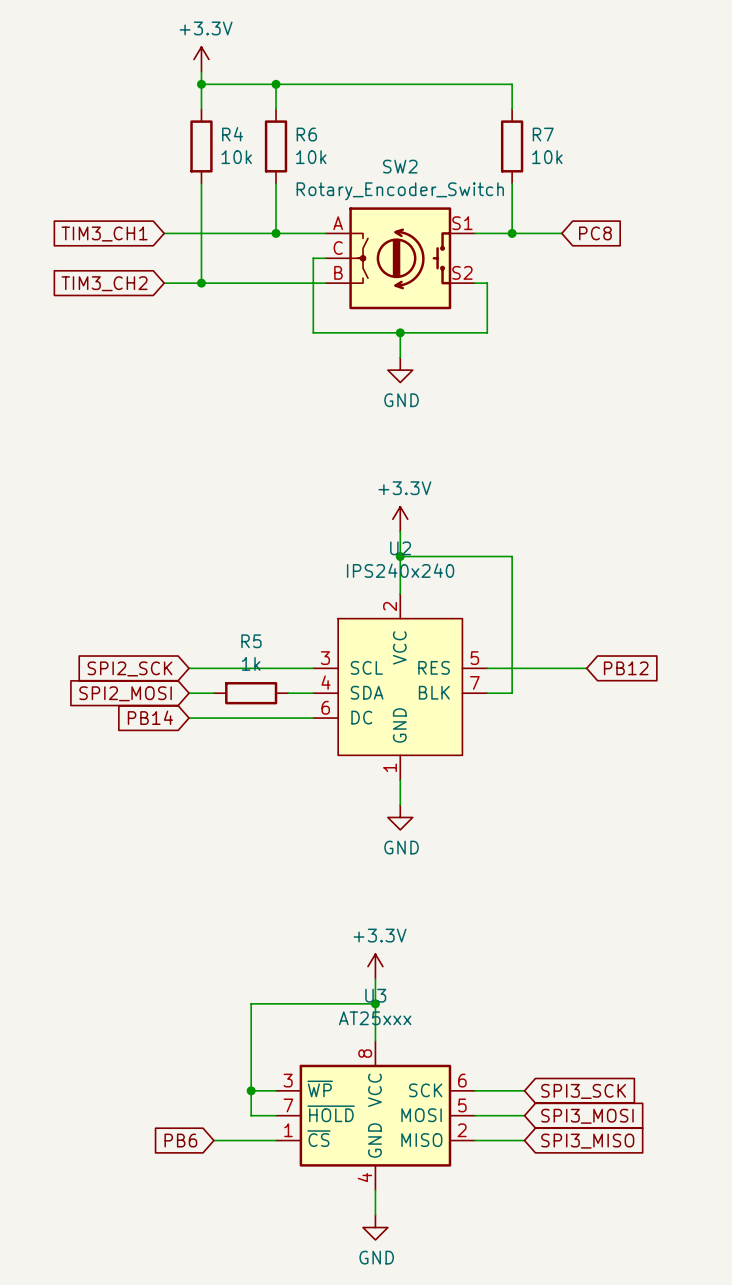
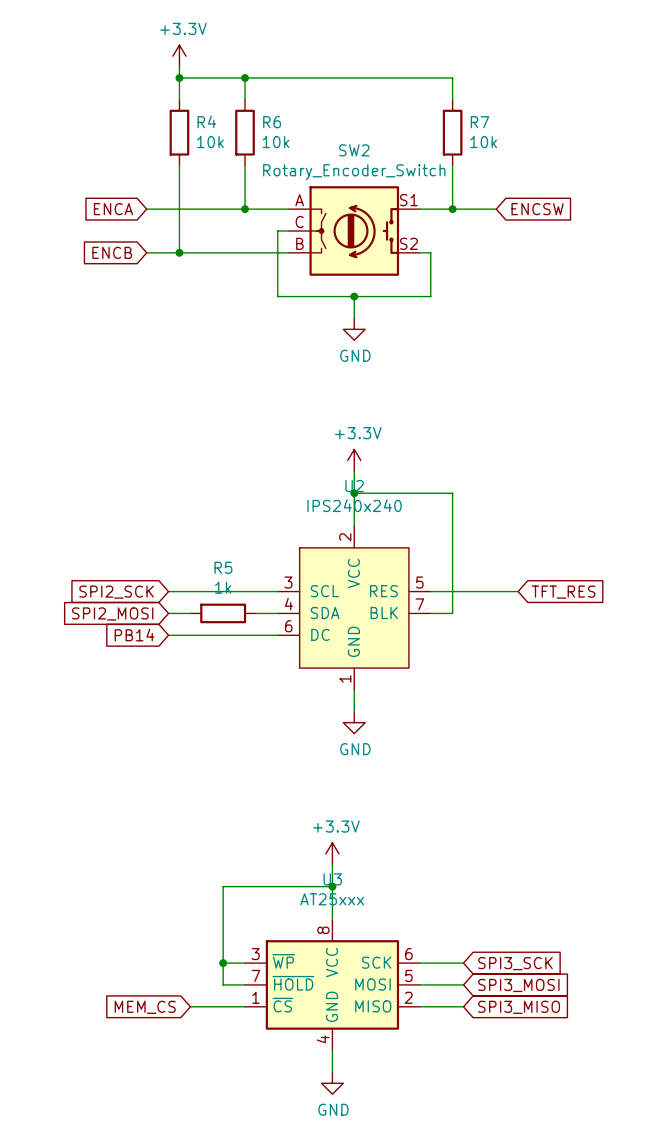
global label: PC8 (595, 233) -> ENCSW (537, 209)
global label: TIM3_CH1 (104, 234) -> ENCA (113, 209)
global label: TIM3_CH2 (104, 283) -> ENCB (112, 252)
global label: PB12 (626, 668) -> TFT_RES (563, 592)
global label: PB6 (180, 1140) -> MEM_CS (145, 1007)

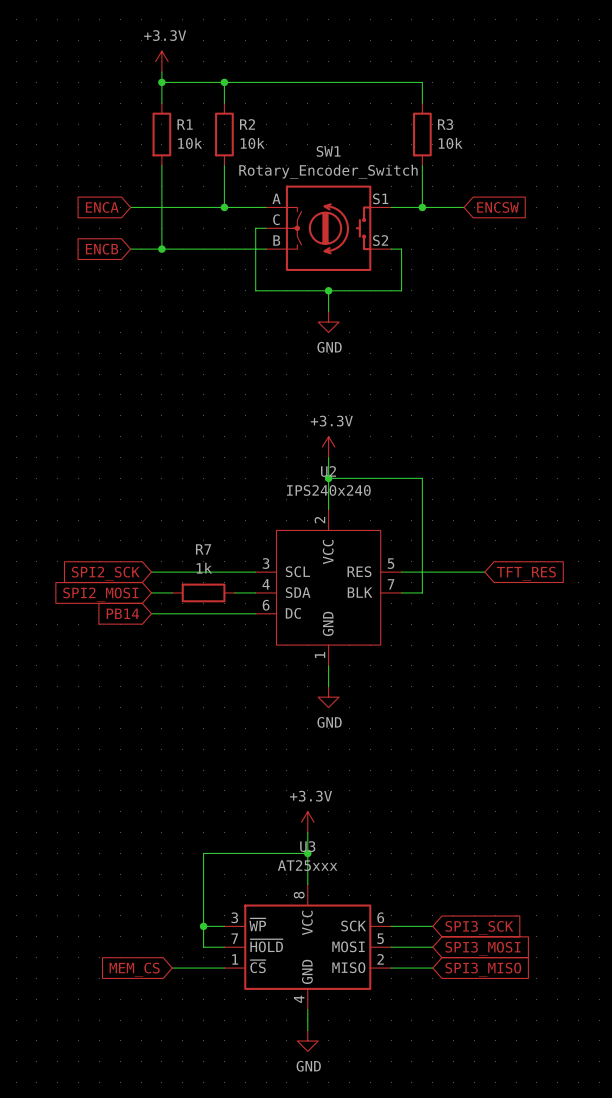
R4 name: R4 (206, 121) -> R1 (185, 124)
R6 name: R6 (272, 122) -> R2 (247, 124)
R7 name: R7 (479, 122) -> R3 (445, 124)
SW2 name: SW2 (354, 150) -> SW1 (328, 151)
R5 name: R5 (223, 567) -> R7 (203, 549)

